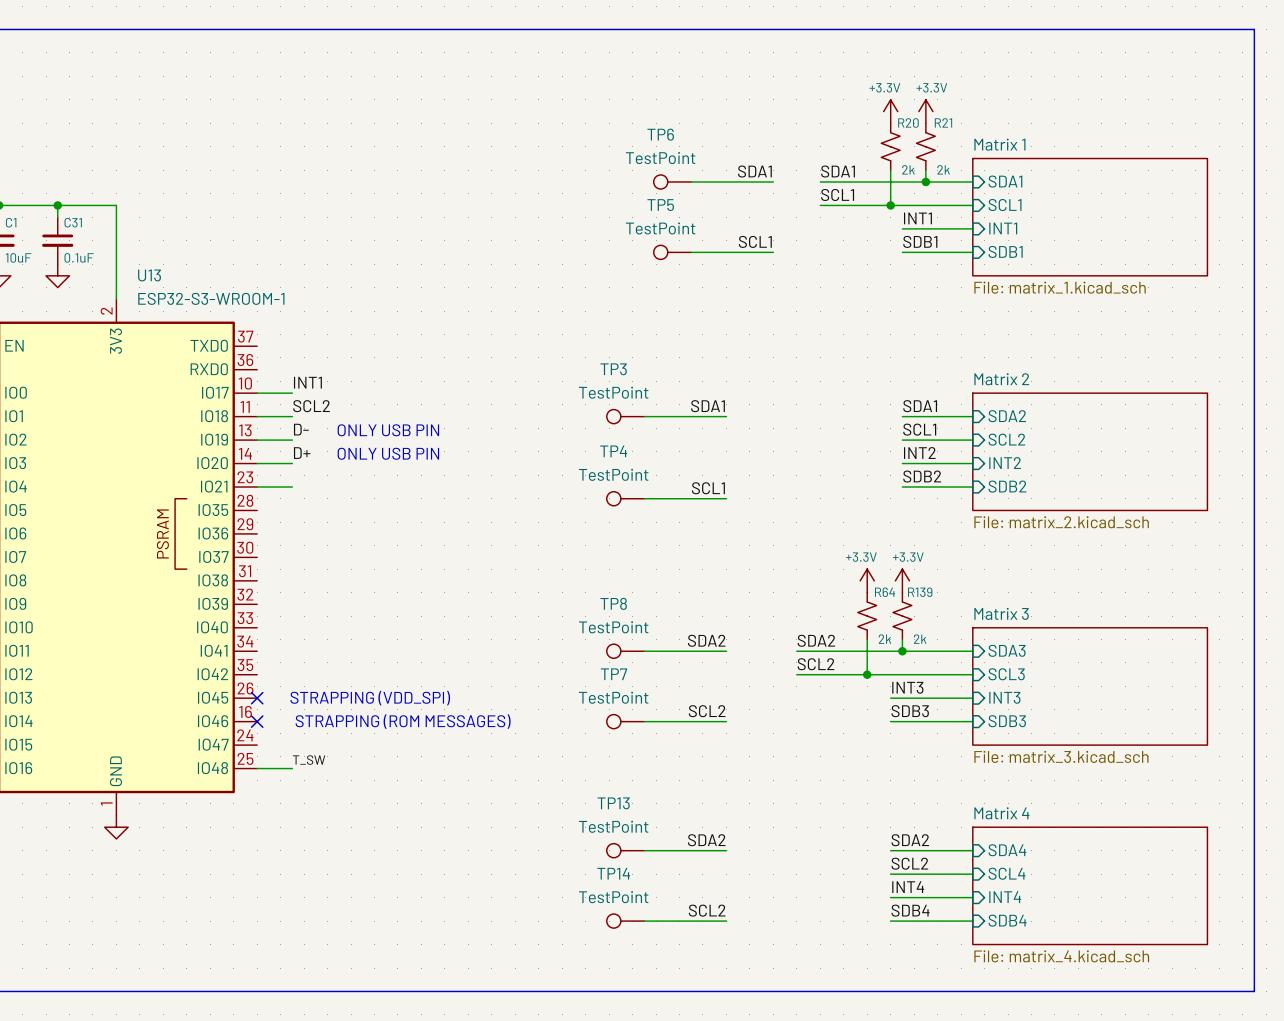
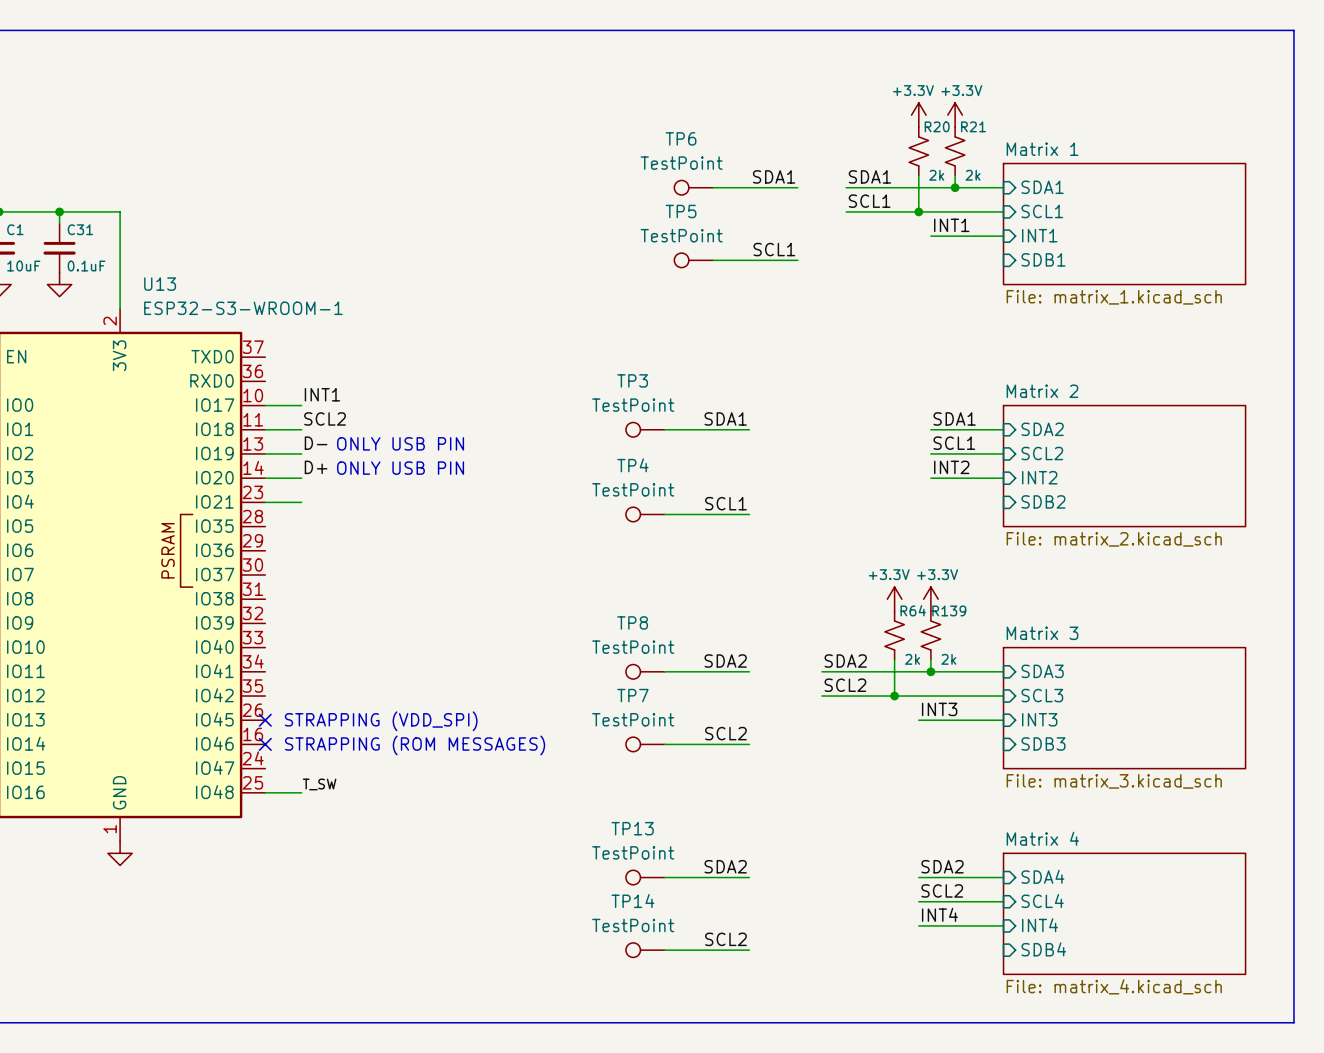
label: SDB1 (920, 241) -> none
wire: (902, 252) (972, 252) -> none
label: SDB2 (922, 476) -> none
wire: (902, 487) (972, 487) -> none
label: SDB3 (910, 711) -> none
wire: (890, 721) (972, 721) -> none
label: SDB4 (910, 910) -> none
wire: (890, 921) (972, 921) -> none

